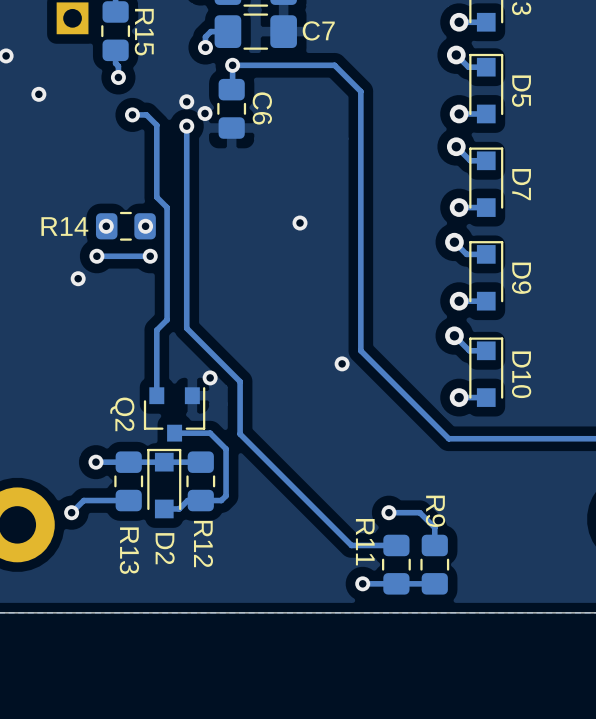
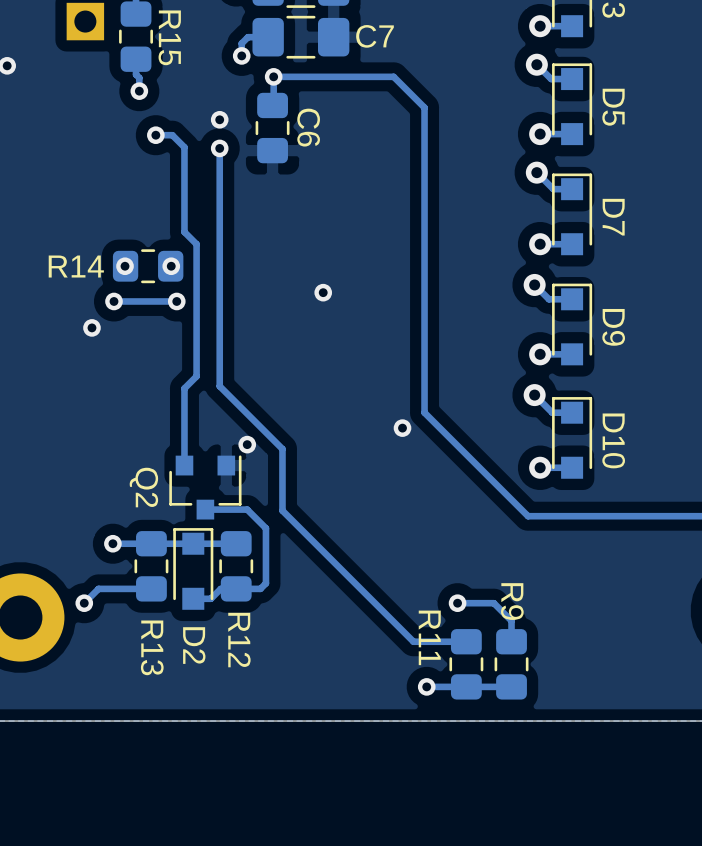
via: (38, 94) -> none
via: (205, 113) -> none
via position: (300, 223) -> (323, 292)

